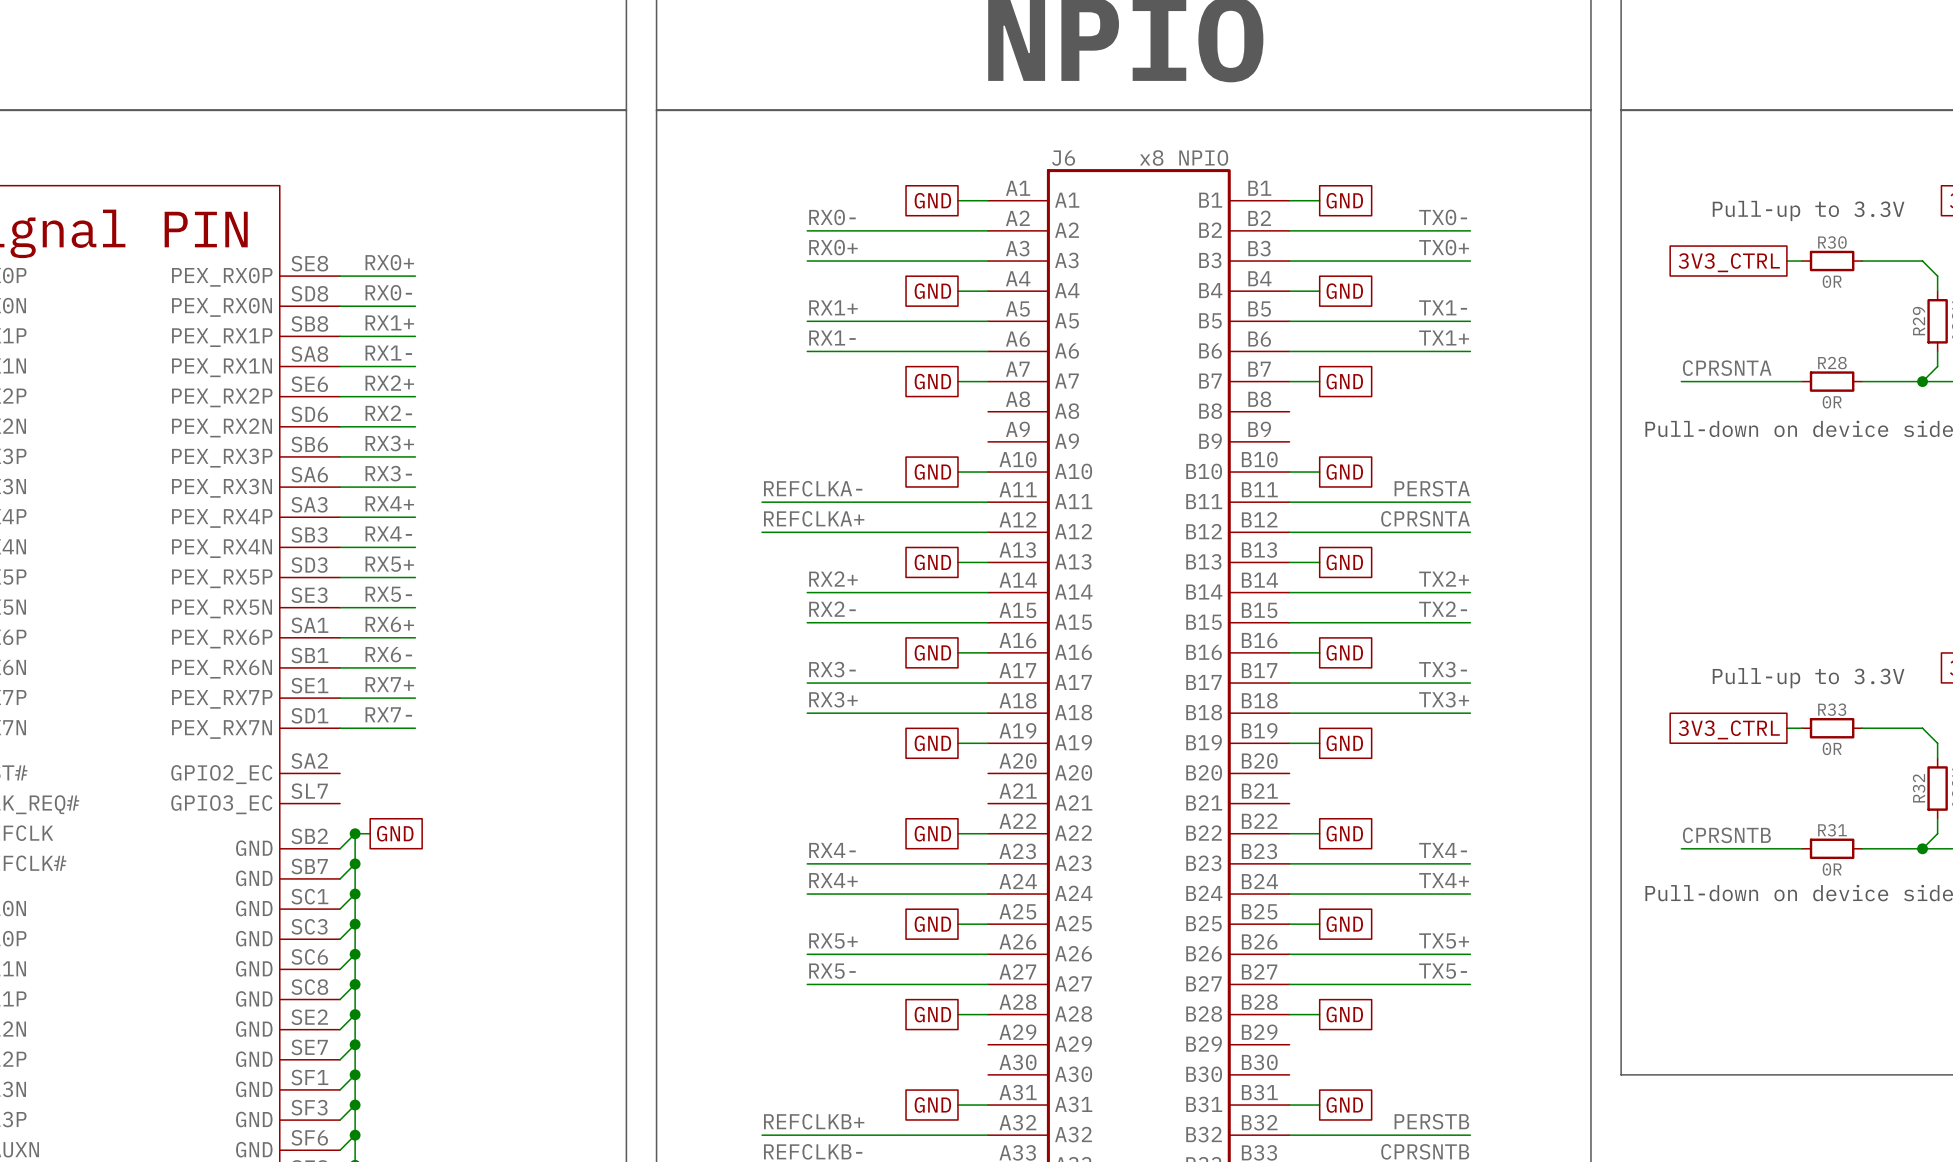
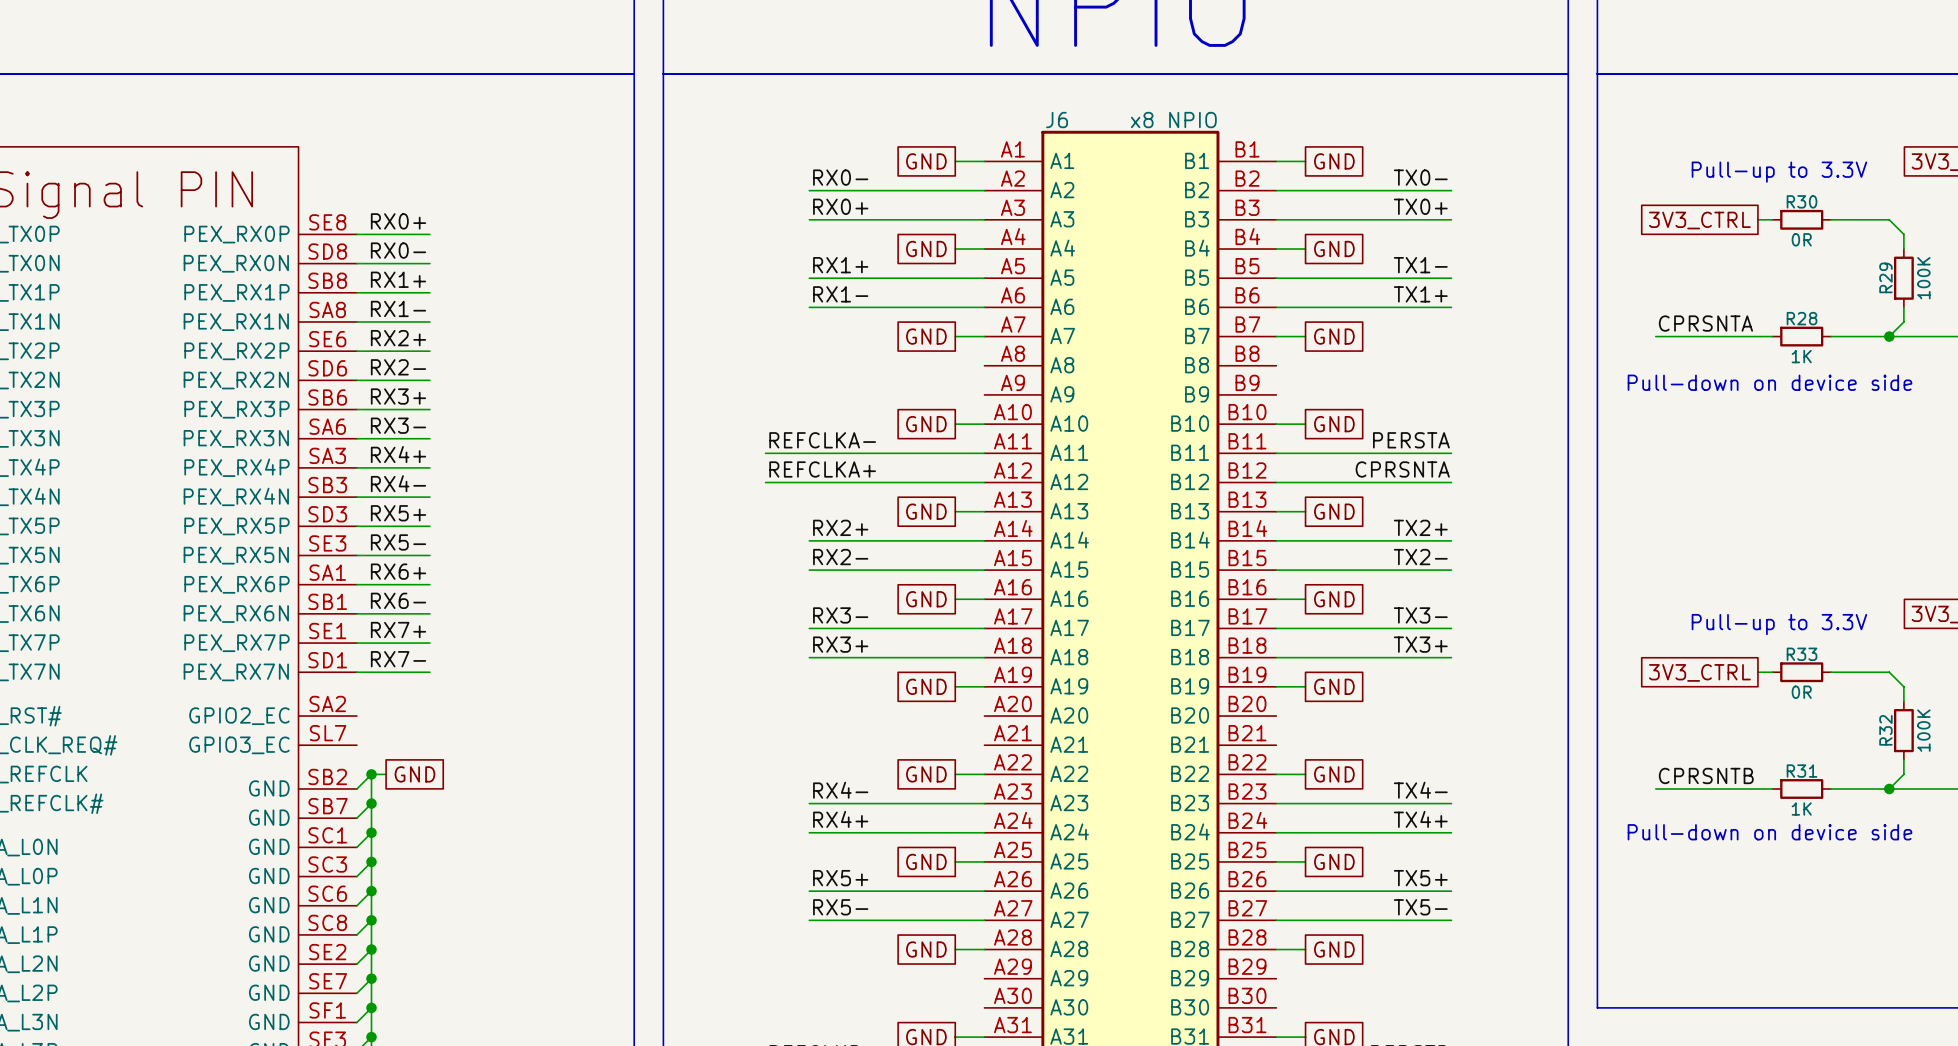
R28 value: 0R (1832, 402) -> 1K (1801, 356)
R31 value: 0R (1832, 869) -> 1K (1801, 808)

